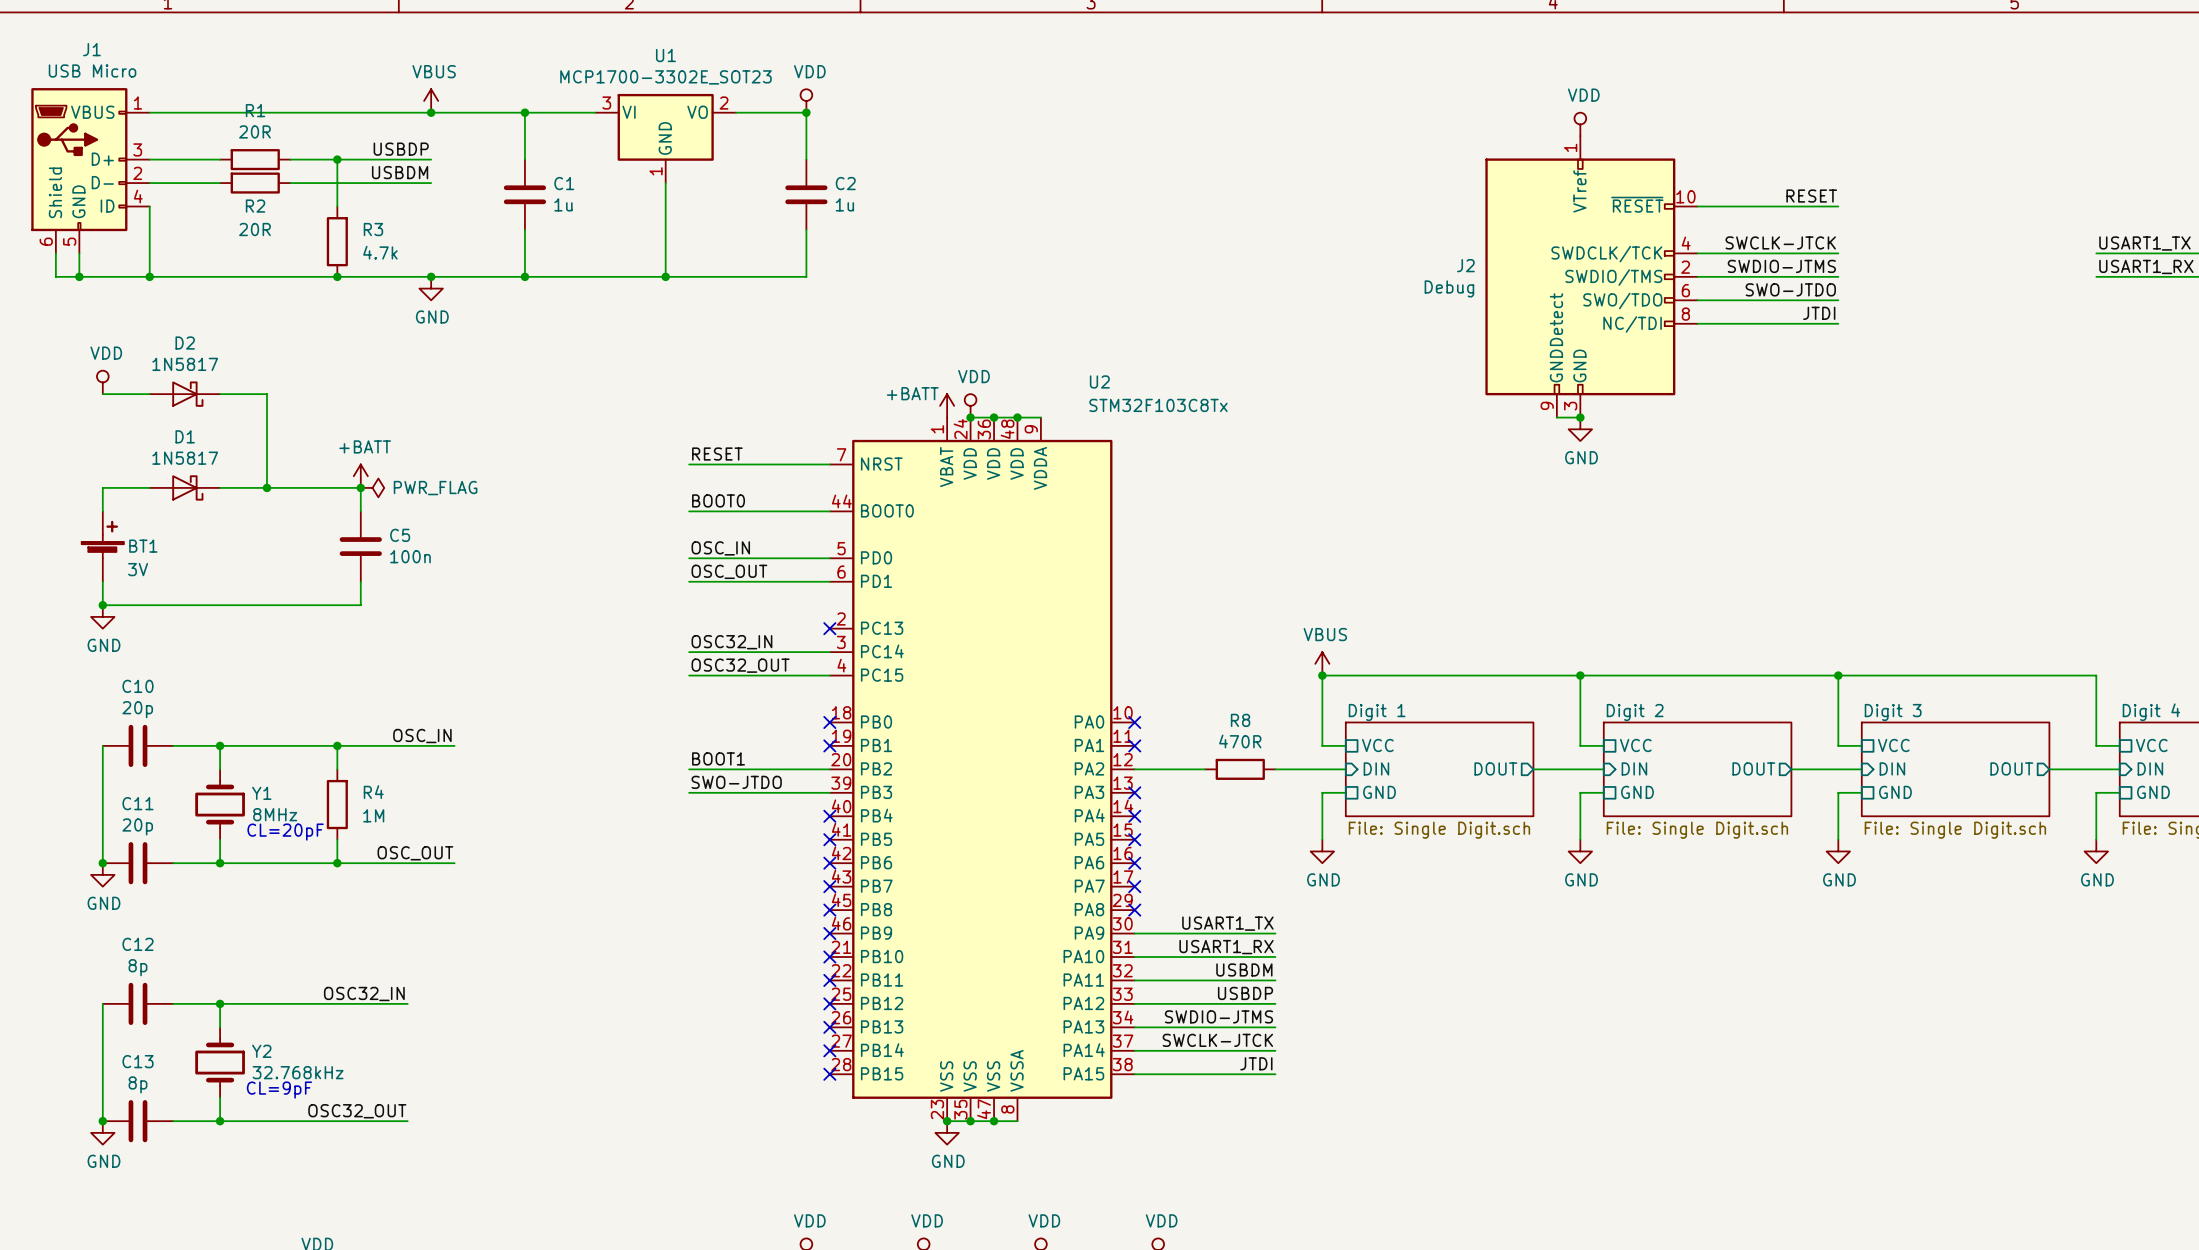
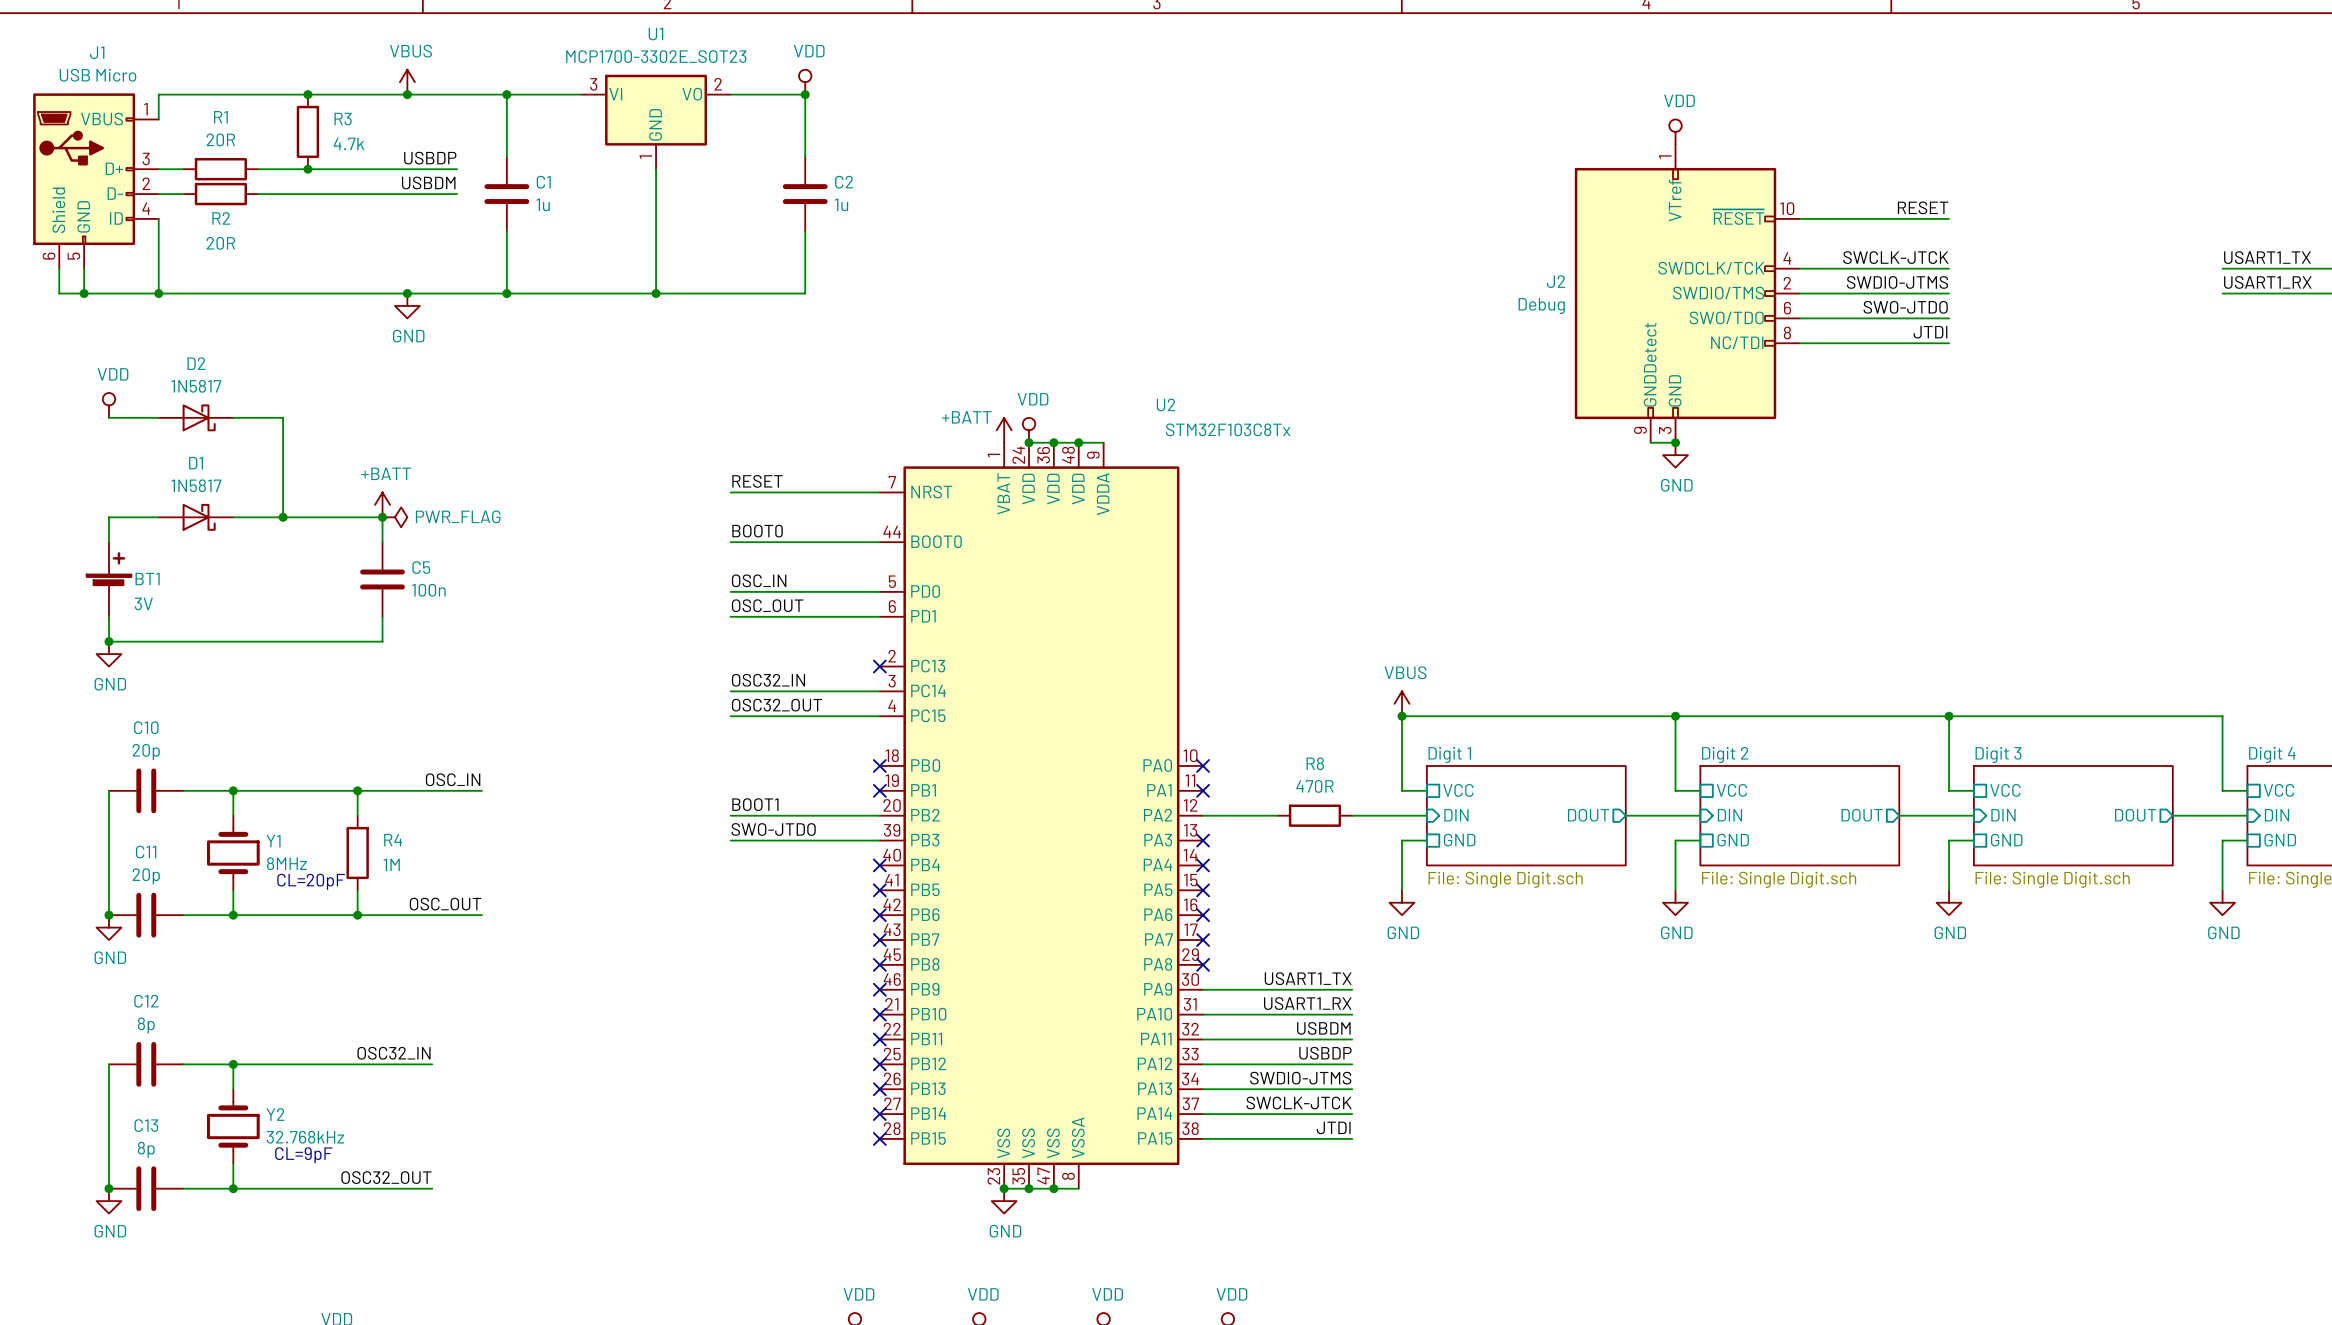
junction: none -> (307, 94)
junction: none -> (407, 94)
wire: none -> (506, 94) (506, 156)
junction: none -> (506, 94)
wire: none -> (730, 94) (805, 94) (805, 156)
power symbol position: VBUS (431, 100) -> VBUS (407, 82)
power symbol position: VDD (806, 100) -> VDD (805, 82)
wire: (149, 112) (595, 112) -> (158, 119) (158, 94) (581, 94)
junction: (431, 112) -> none
wire: (524, 112) (524, 159) -> none
junction: (524, 112) -> none
wire: (736, 112) (806, 112) (806, 159) -> none
junction position: (806, 112) -> (805, 94)
U1 position: (665, 138) -> (656, 121)
wire: (173, 159) (220, 159) -> (258, 169) (307, 169)
R1 position: (255, 159) -> (220, 169)
junction: none -> (307, 169)
wire: (337, 159) (337, 206) -> none
junction: (337, 159) -> none
wire: none -> (656, 169) (656, 293)
wire: (173, 183) (220, 183) -> (258, 194) (307, 194)
R2 position: (255, 183) -> (220, 194)
wire: (665, 183) (665, 276) -> none
C1 position: (524, 194) -> (506, 194)
C2 position: (806, 194) -> (805, 194)
wire: none -> (506, 231) (506, 293)
wire: (524, 229) (524, 276) -> none
wire: (806, 229) (806, 276) (759, 276) -> (805, 231) (805, 293)
R3 position: (337, 241) -> (307, 131)
junction: (337, 276) -> none
junction: none -> (407, 293)
junction: (431, 276) -> none
junction: none -> (506, 293)
junction: (524, 276) -> none
junction: none -> (656, 293)
junction: (665, 276) -> none
power symbol position: GND (431, 288) -> GND (407, 305)

